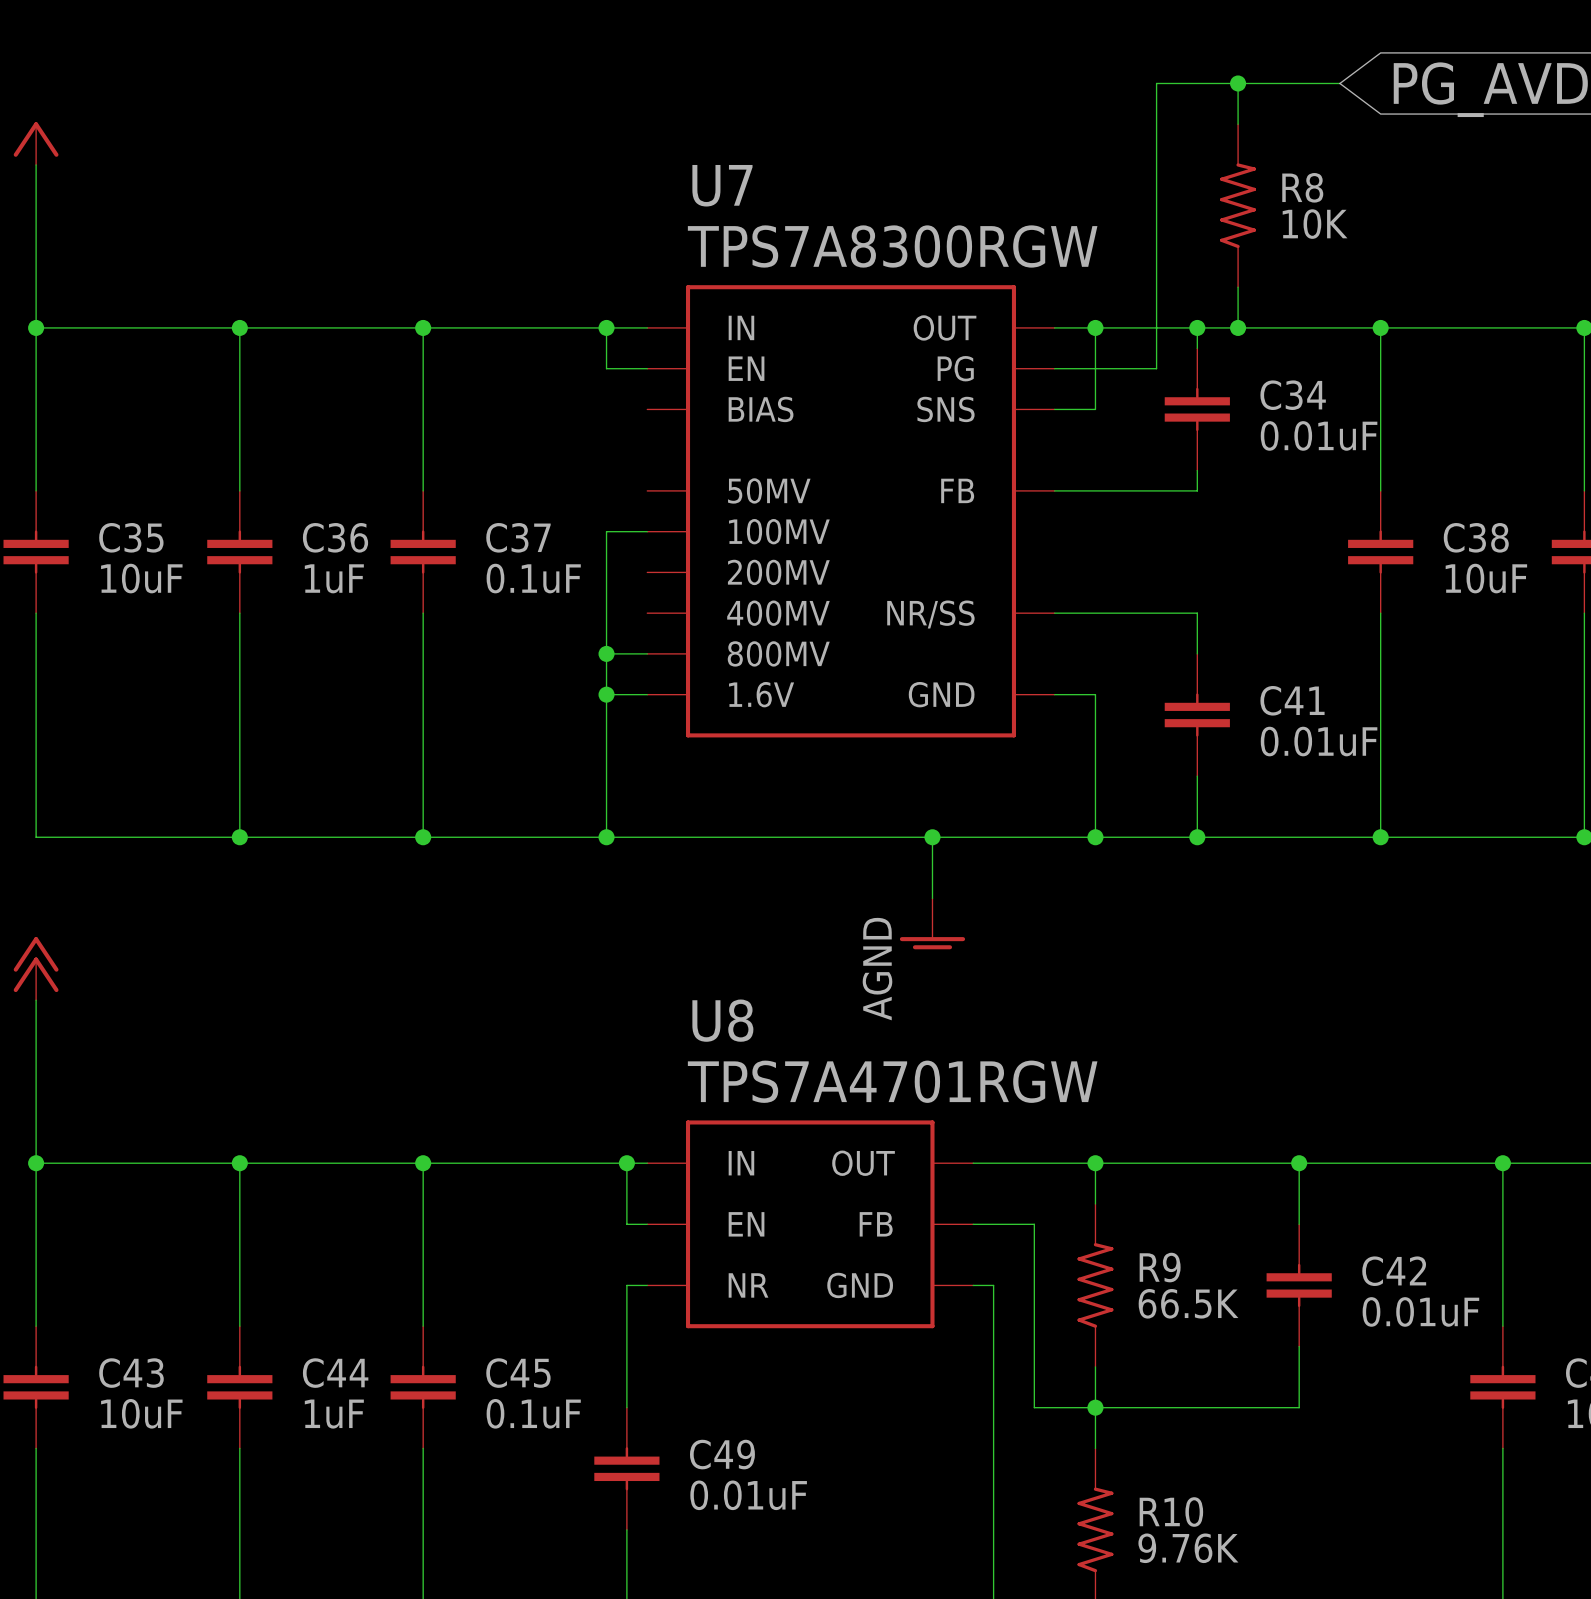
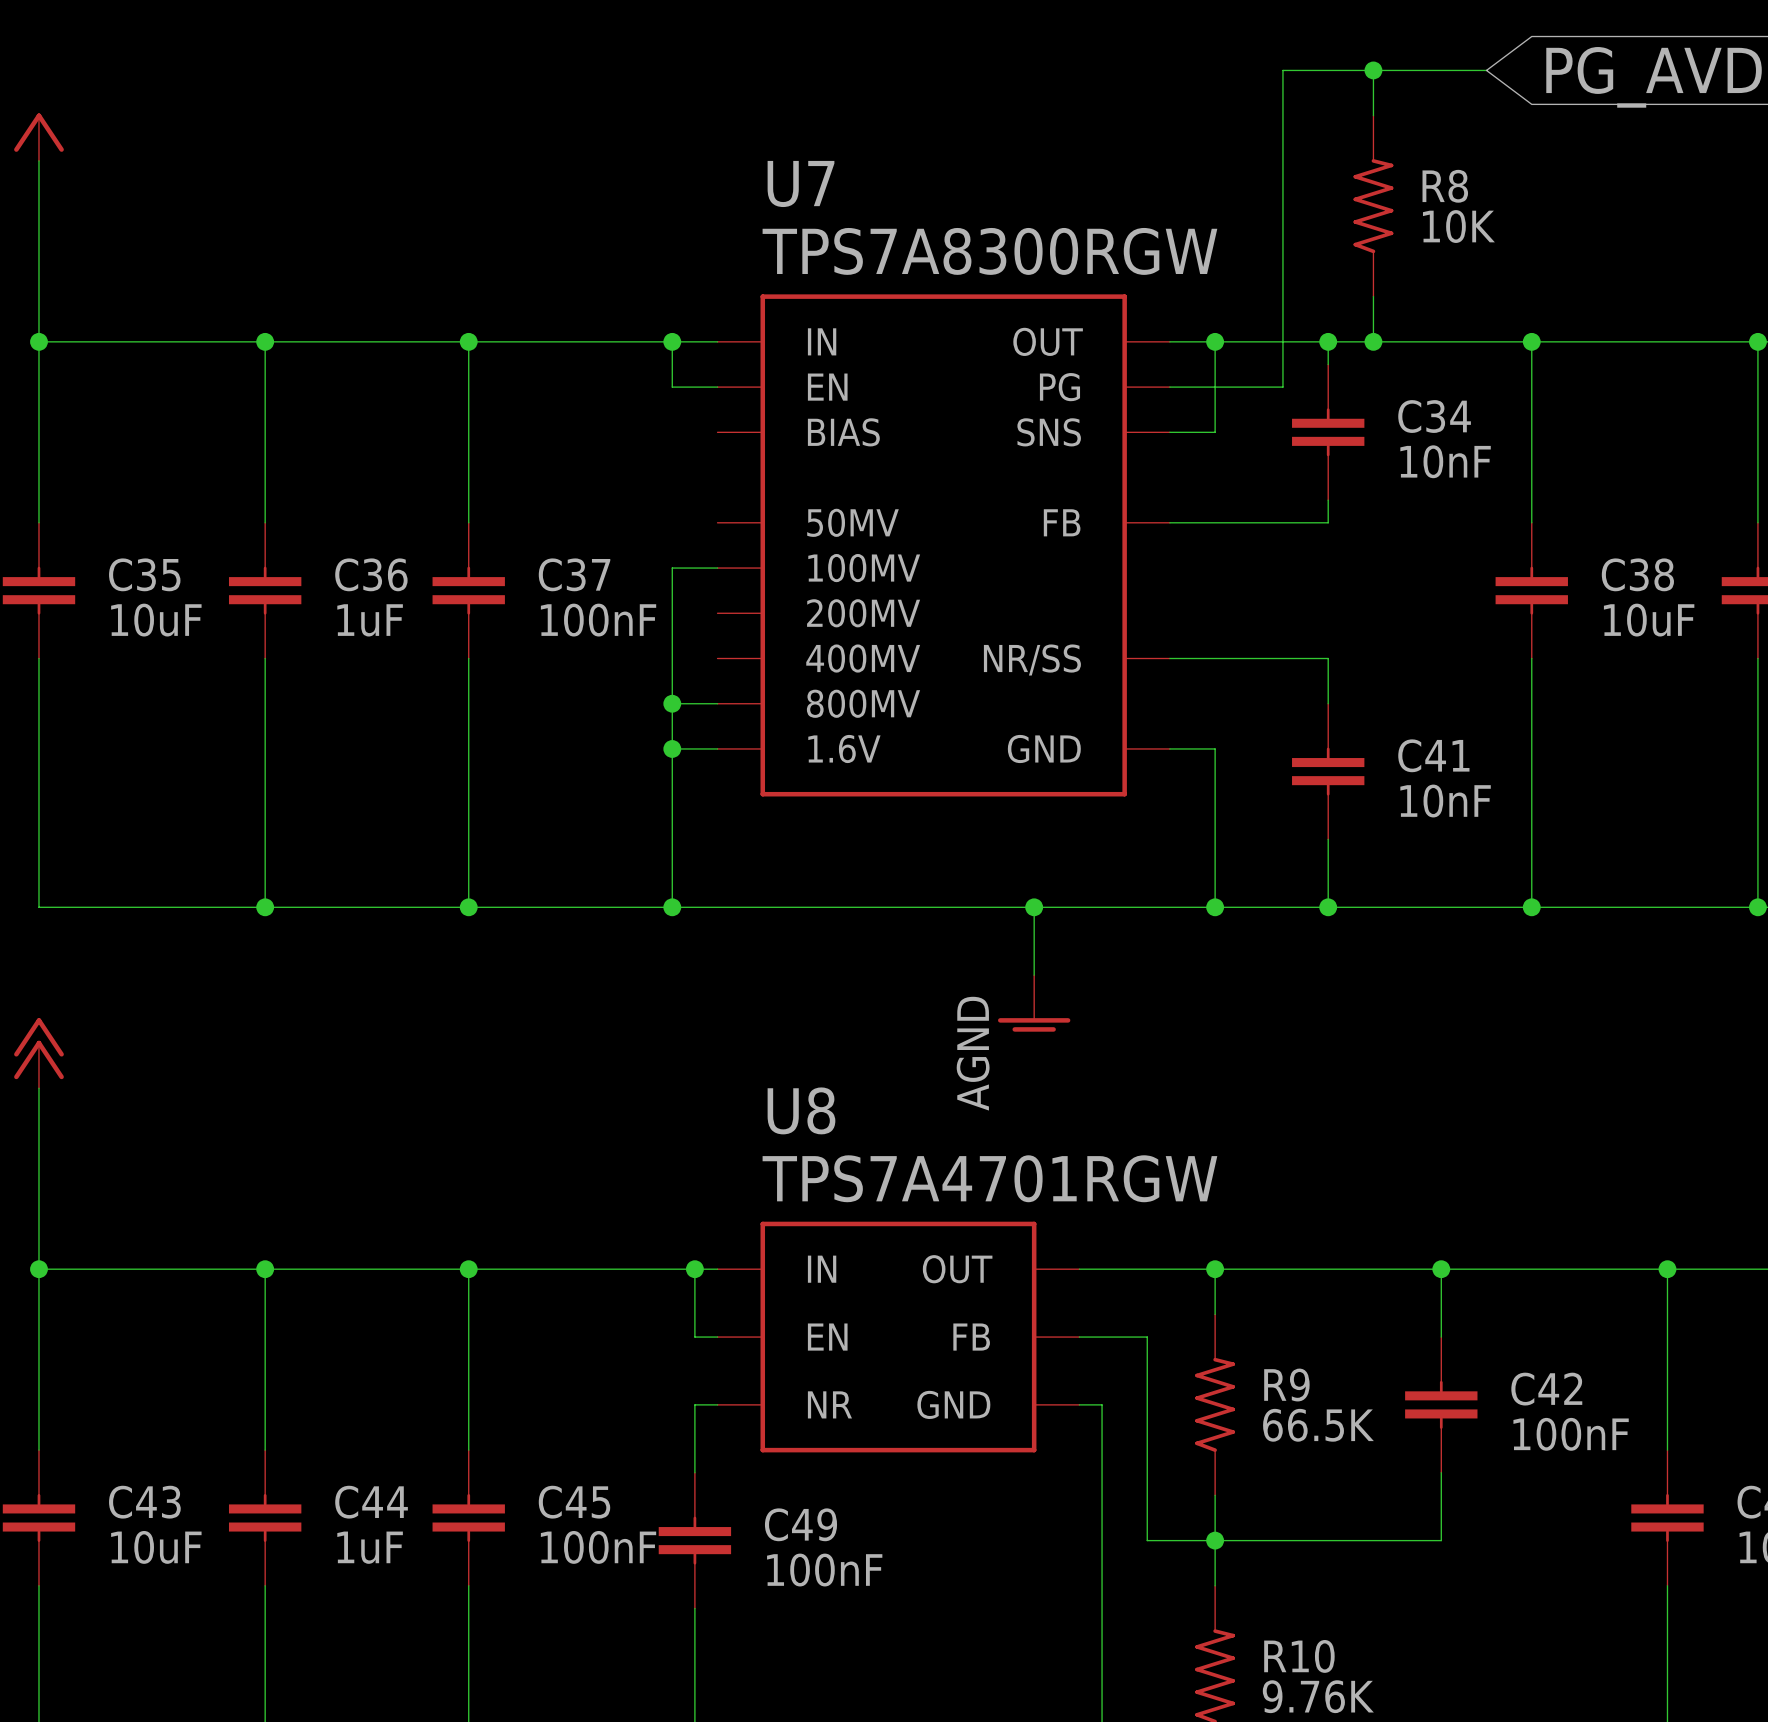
C34 value: 0.01uF (1319, 435) -> 10nF (1445, 461)
C37 value: 0.1uF (533, 578) -> 100nF (598, 620)
C41 value: 0.01uF (1319, 741) -> 10nF (1445, 801)
C42 value: 0.01uF (1420, 1311) -> 100nF (1571, 1434)
C45 value: 0.1uF (533, 1413) -> 100nF (598, 1547)
C49 position: (626, 1468) -> (694, 1540)
C49 value: 0.01uF (748, 1495) -> 100nF (824, 1570)

